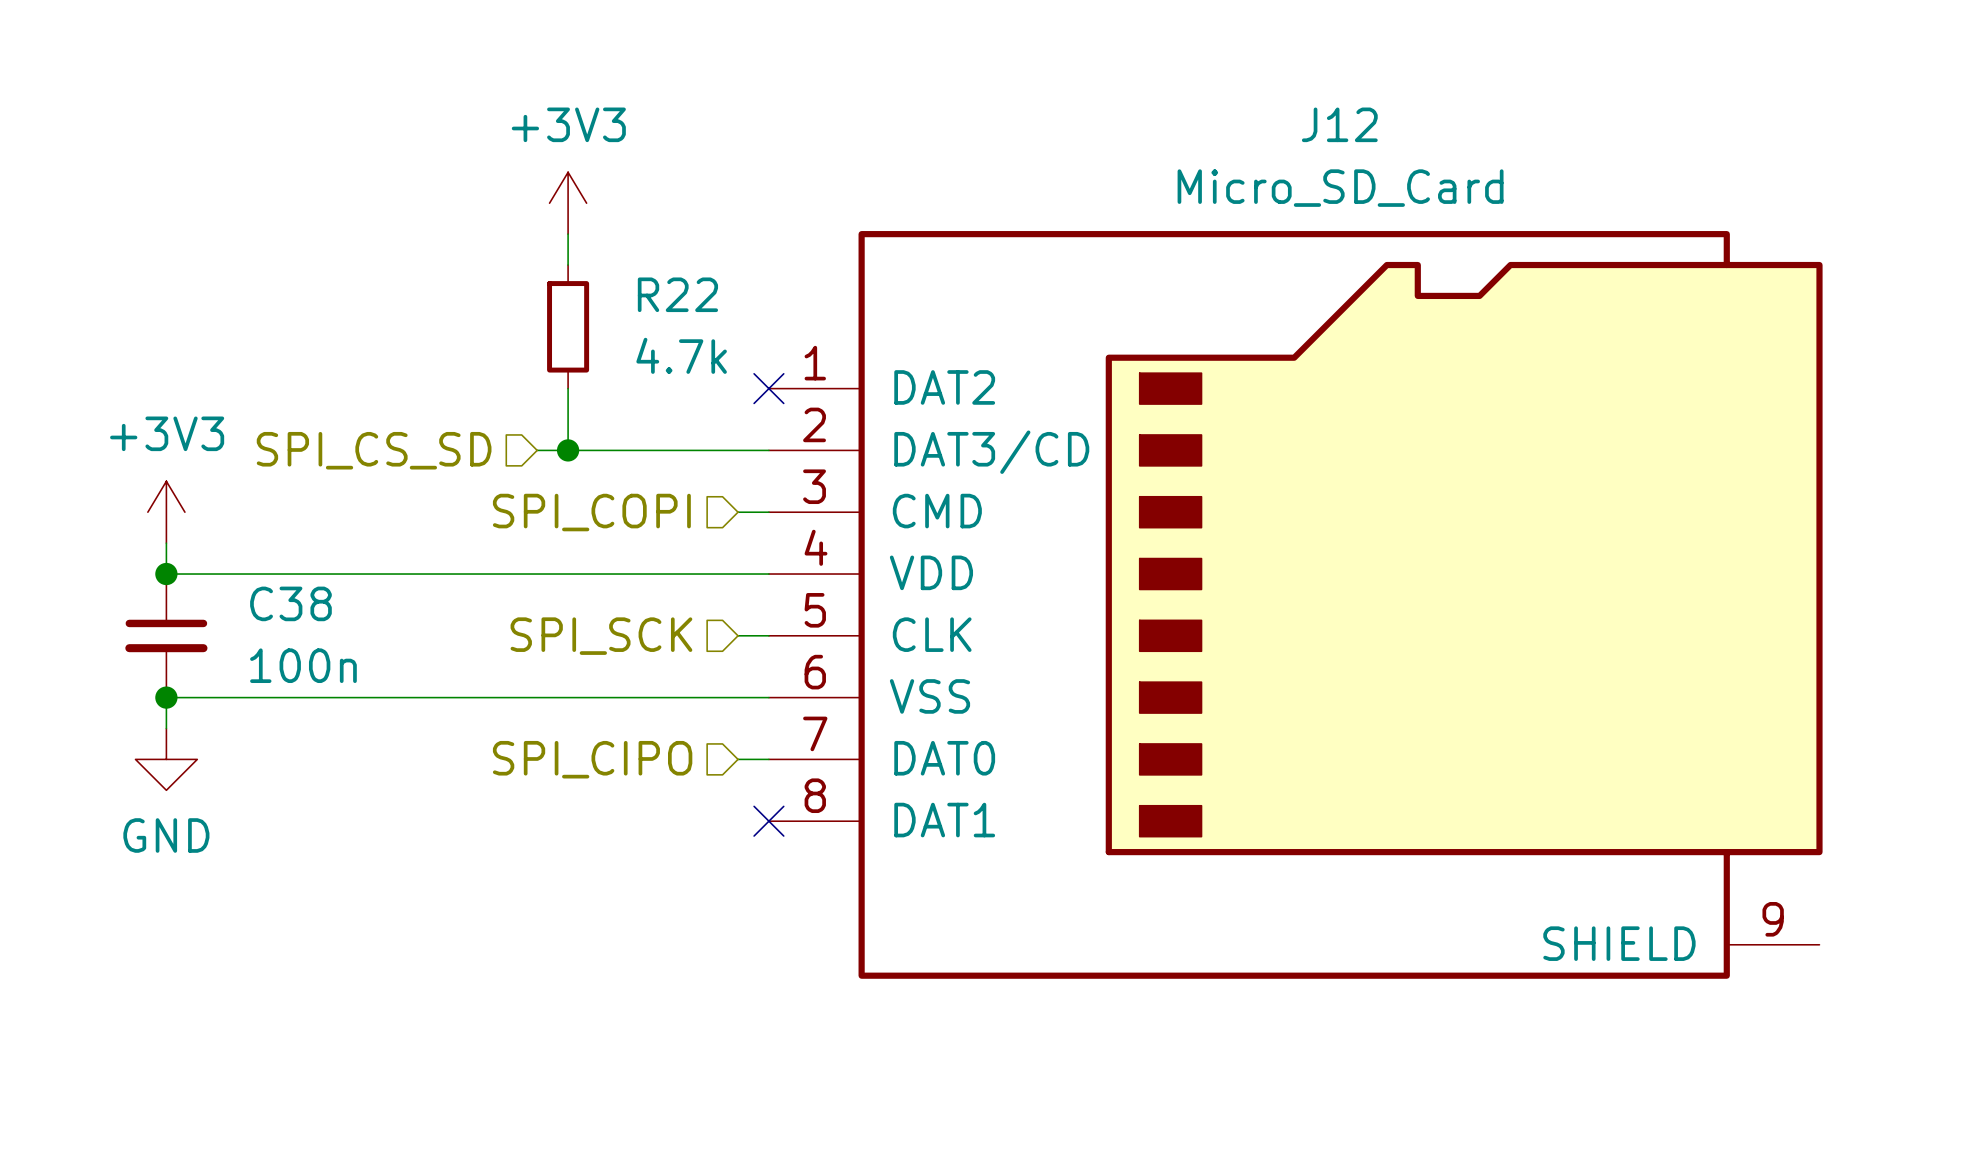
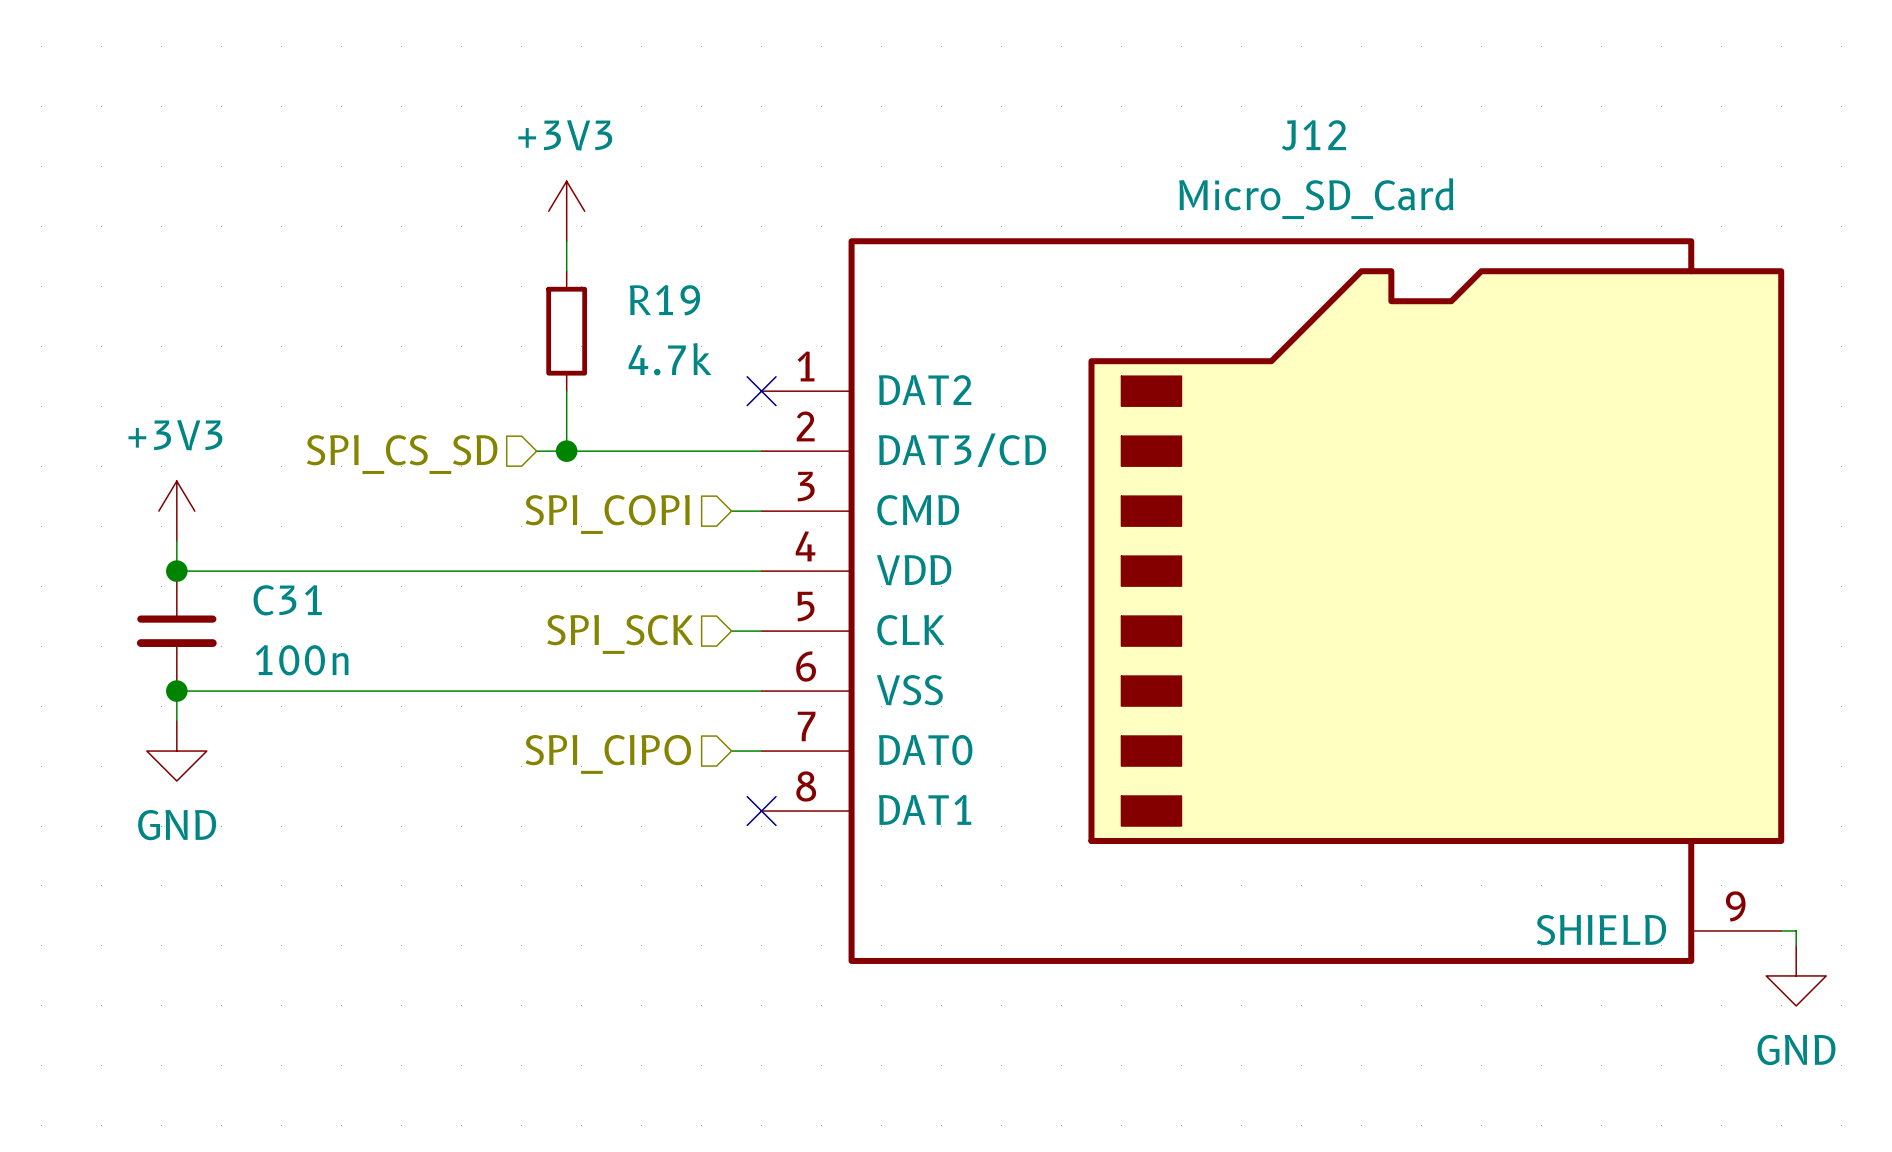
R22 name: R22 (677, 294) -> R19 (664, 300)
C38 name: C38 (290, 603) -> C31 (287, 600)
wire: none -> (1781, 930) (1796, 930) (1796, 945)
power symbol: none -> GND (1796, 975)

